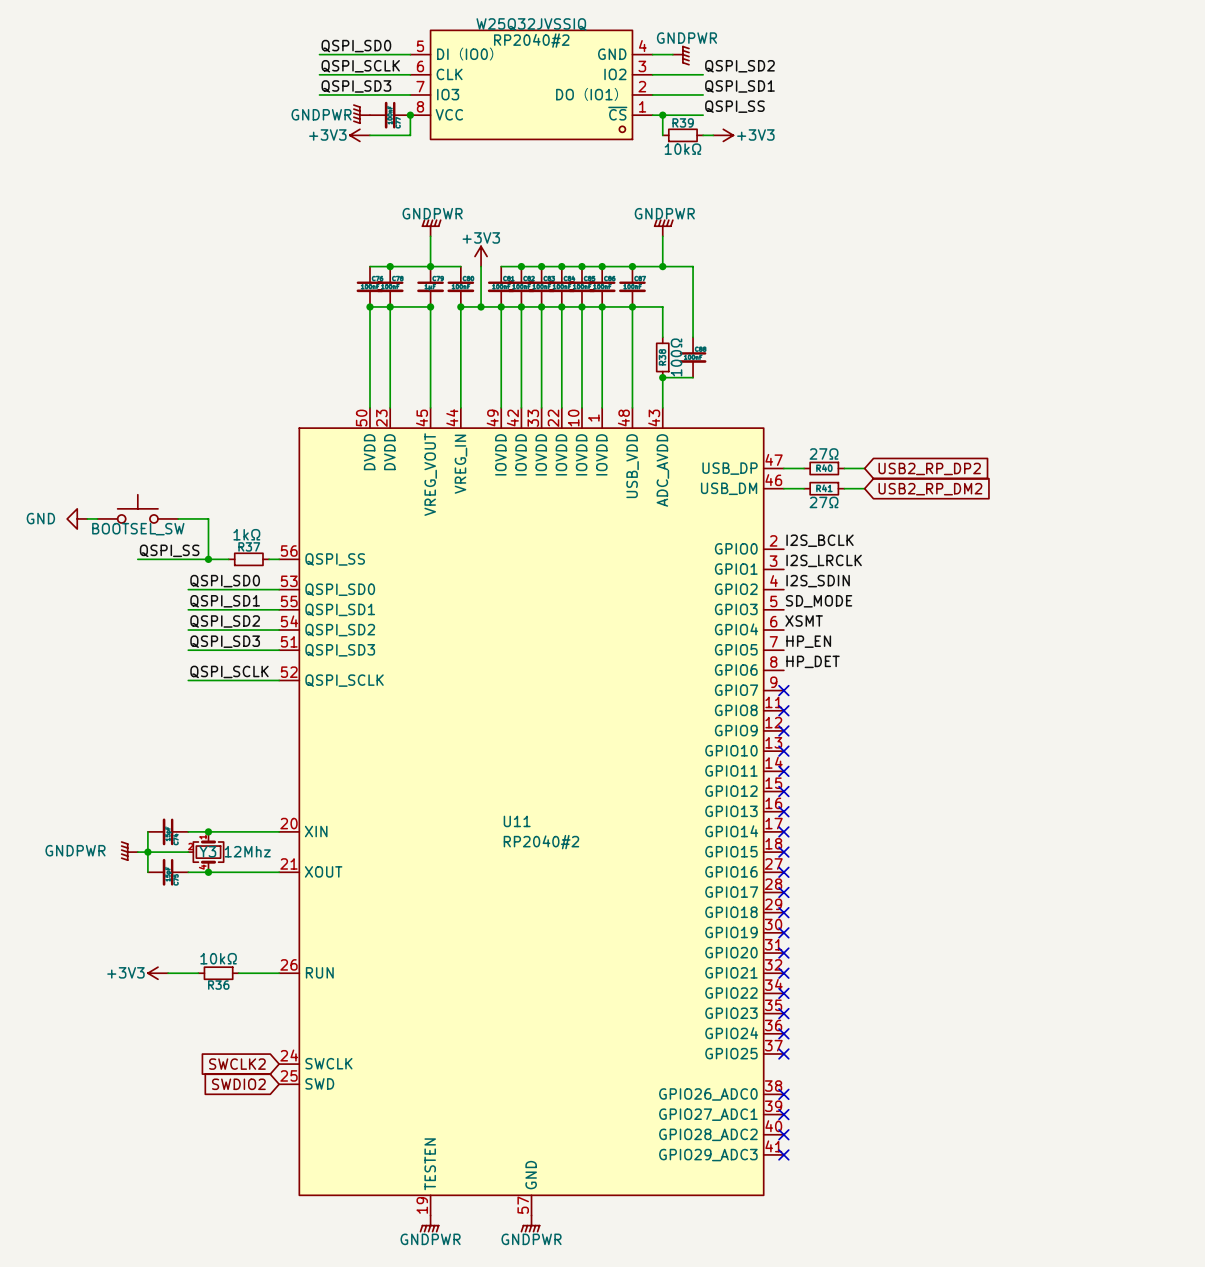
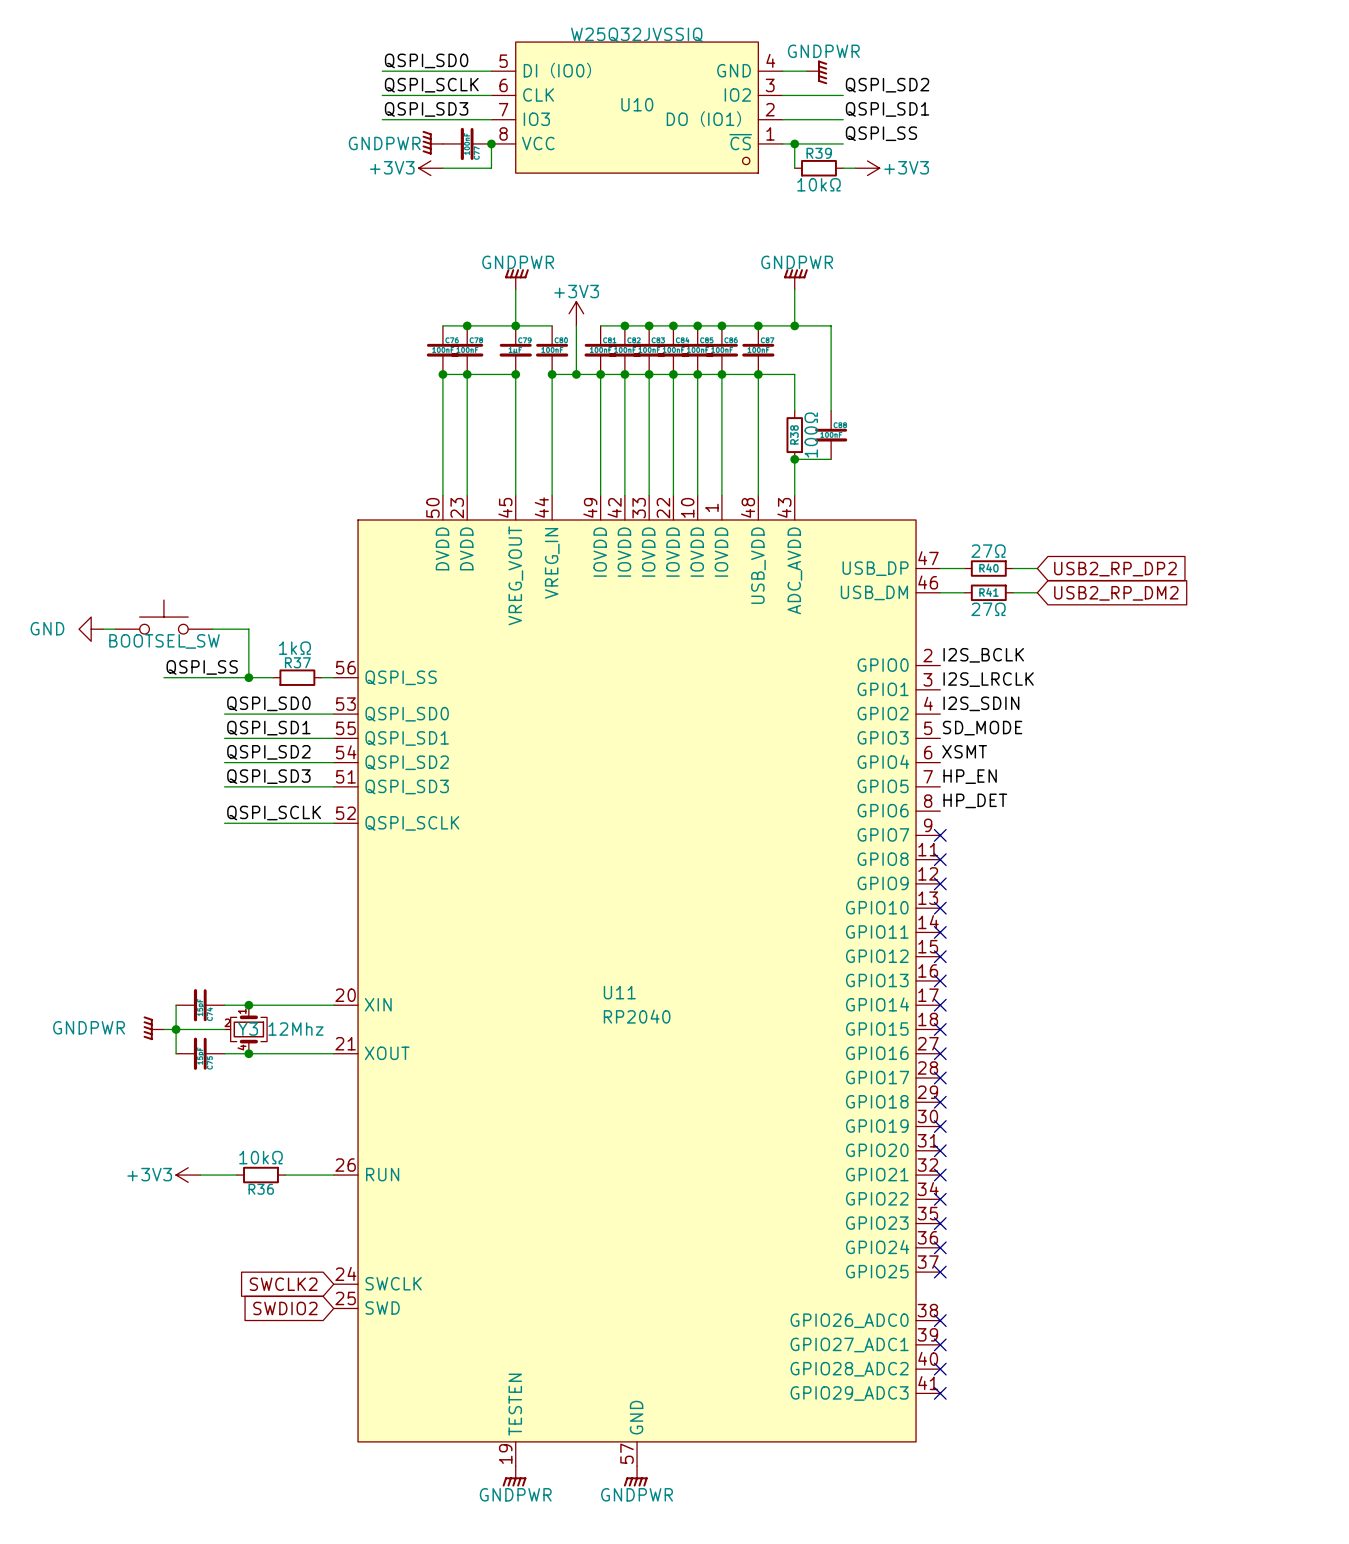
RP2040#2 name: RP2040#2 (531, 40) -> U10 (637, 104)
U11 value: RP2040#2 (541, 842) -> RP2040 (637, 1016)

